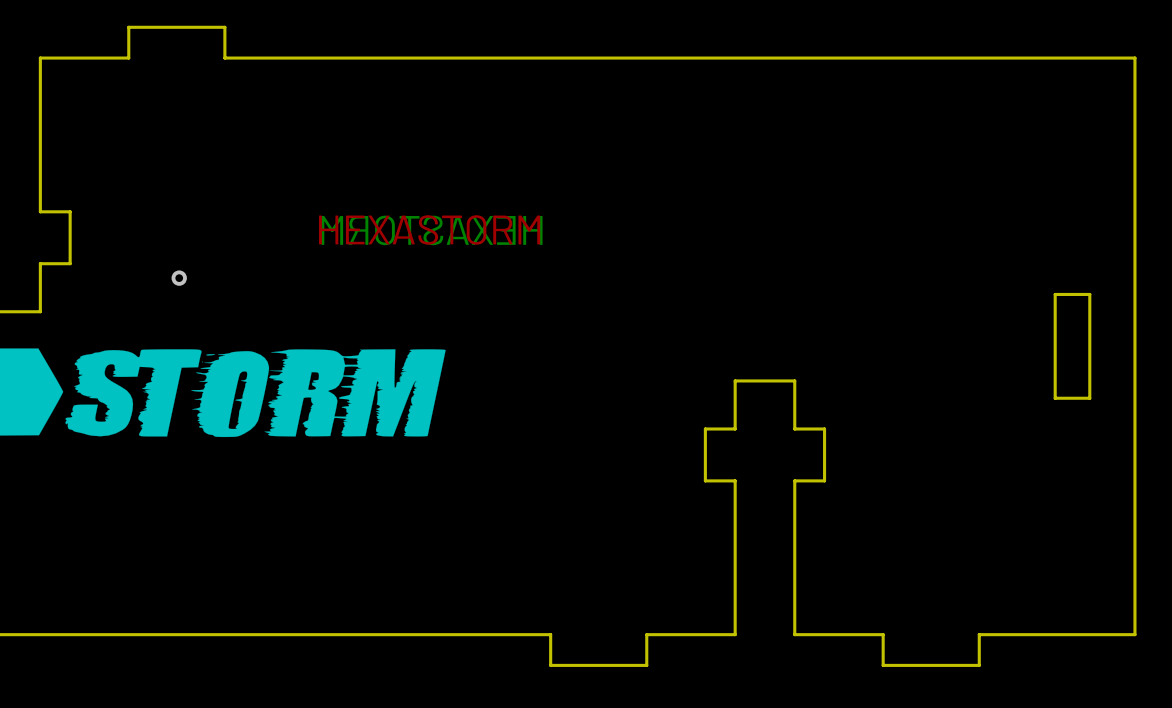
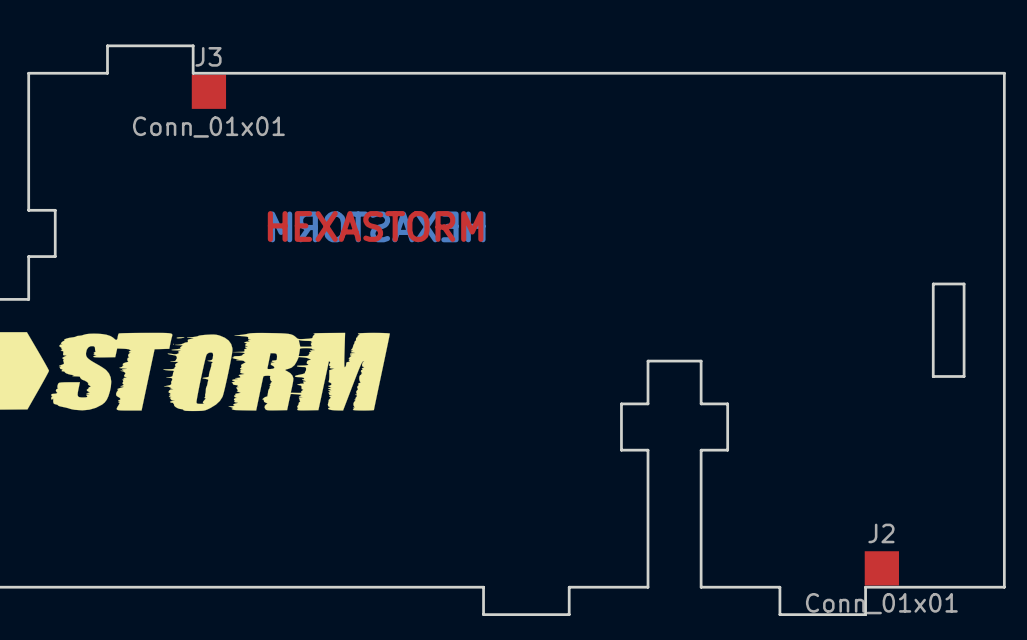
J3: none -> Conn_01x01 (208, 91)
via: (179, 278) -> none
J2: none -> Conn_01x01 (881, 568)

